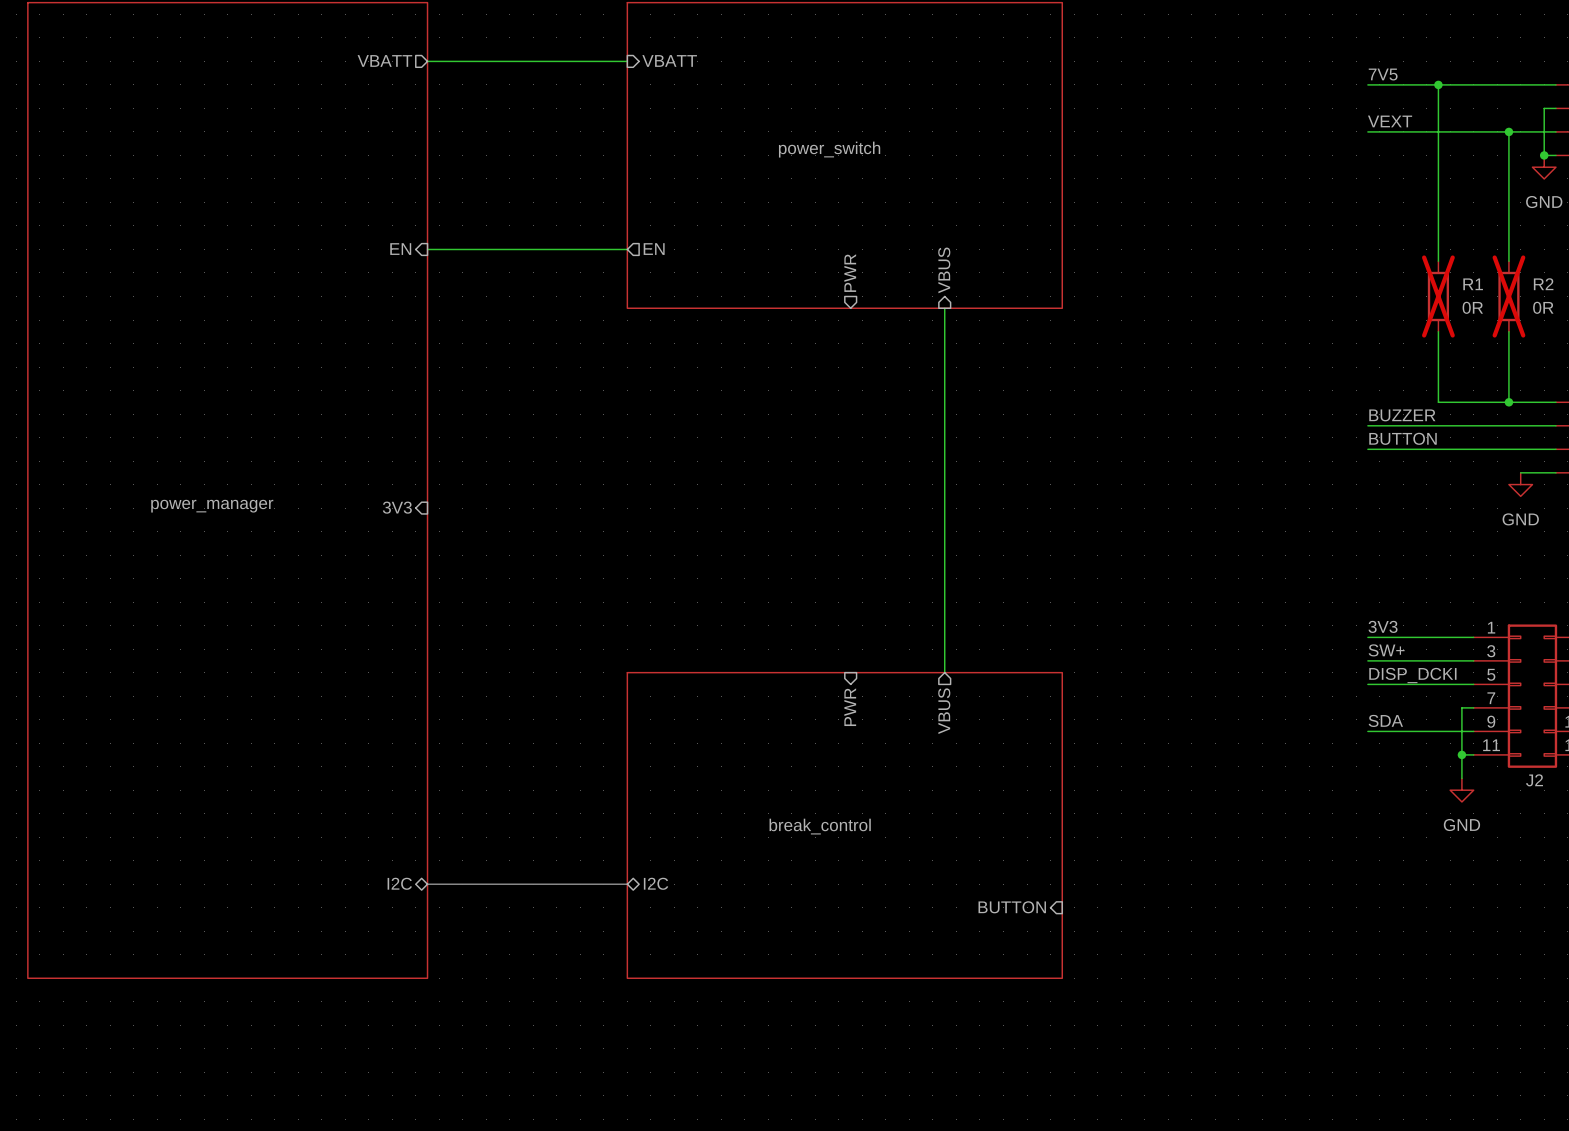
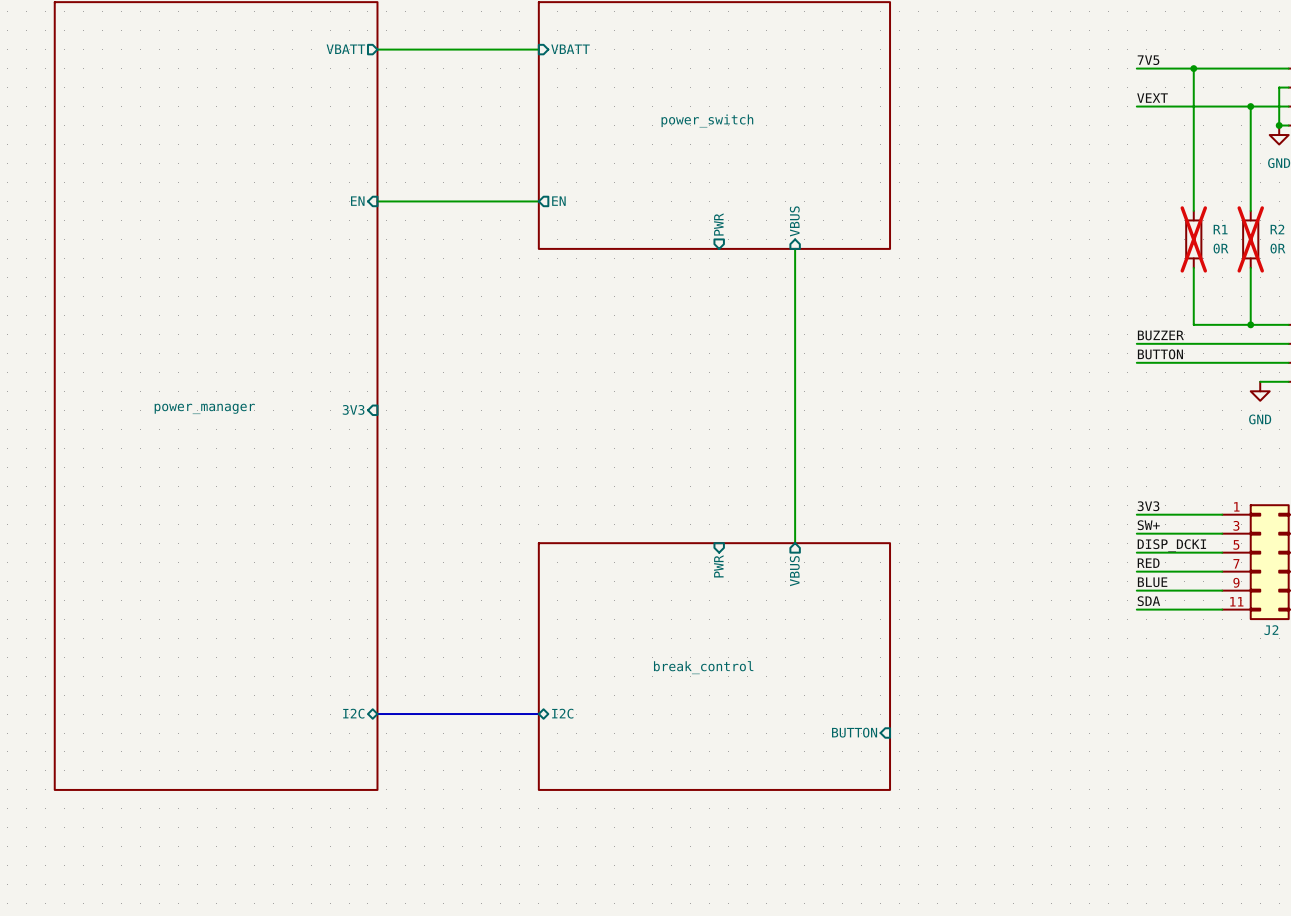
label: none -> RED (1148, 563)
wire: (1461, 707) (1461, 778) -> (1212, 571) (1136, 571)
label: SDA (1385, 720) -> BLUE (1152, 582)
label: none -> SDA (1148, 601)
wire: none -> (1136, 609) (1212, 609)
junction: (1461, 754) -> none
power symbol: GND (1461, 790) -> none

